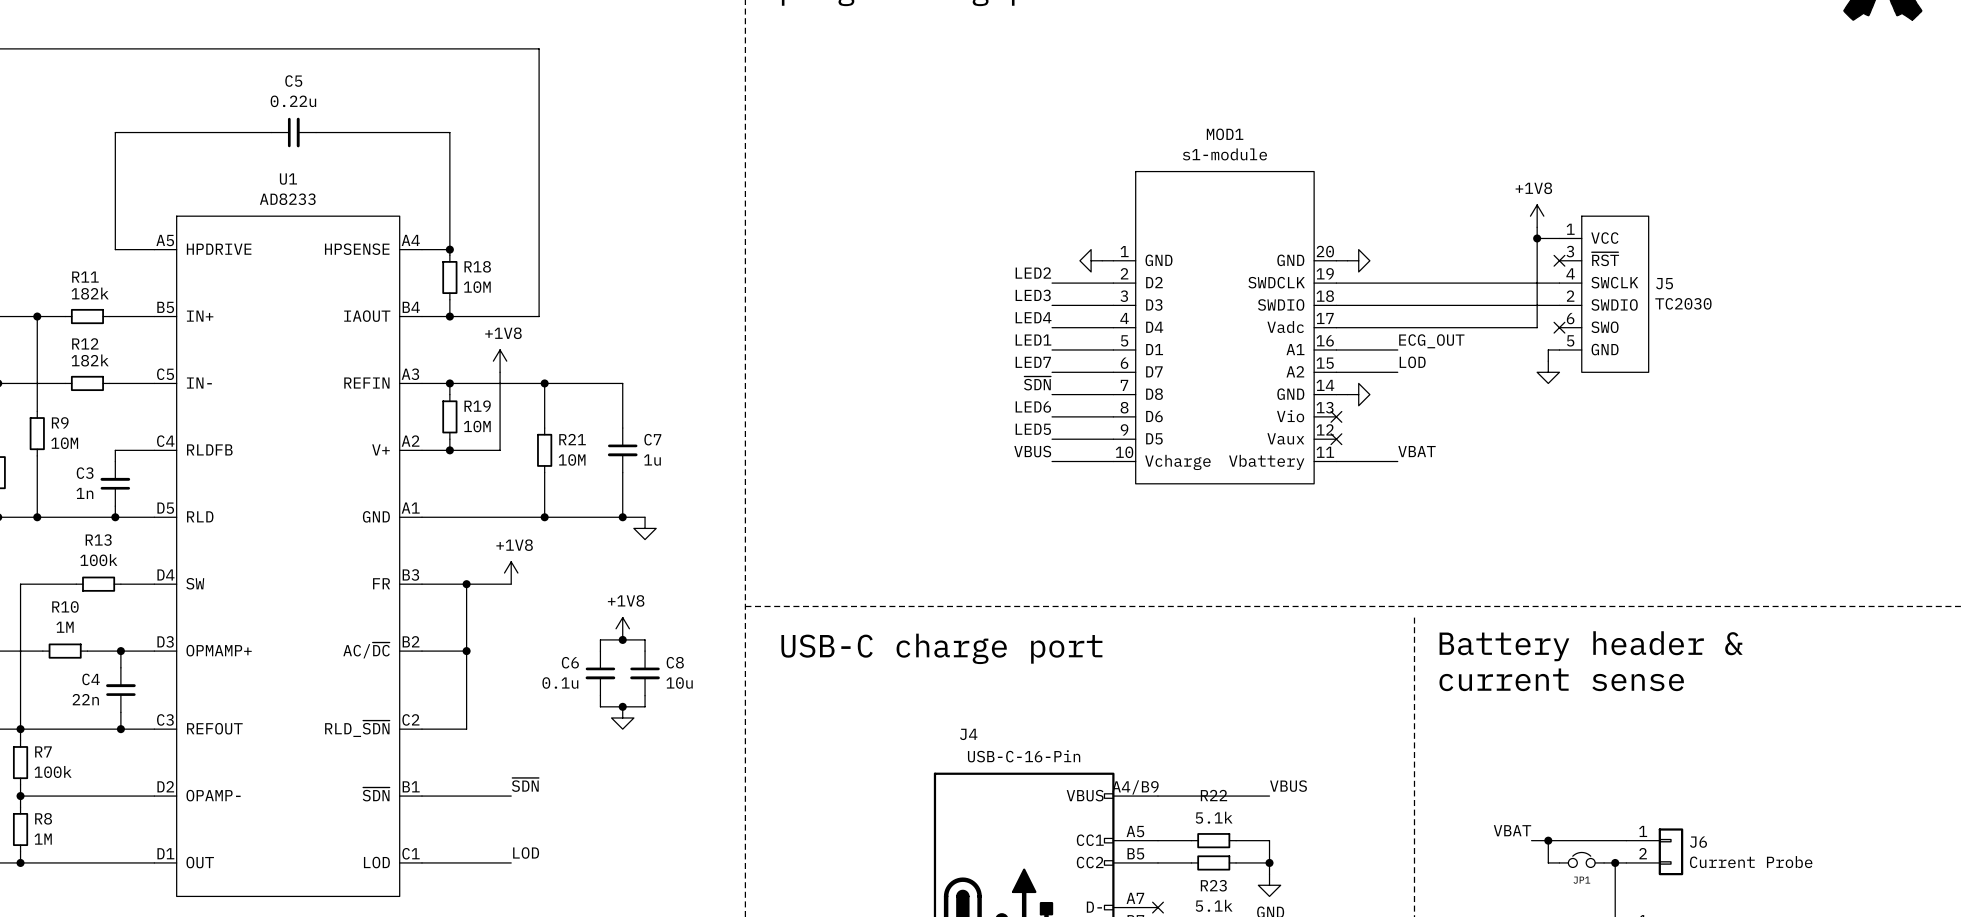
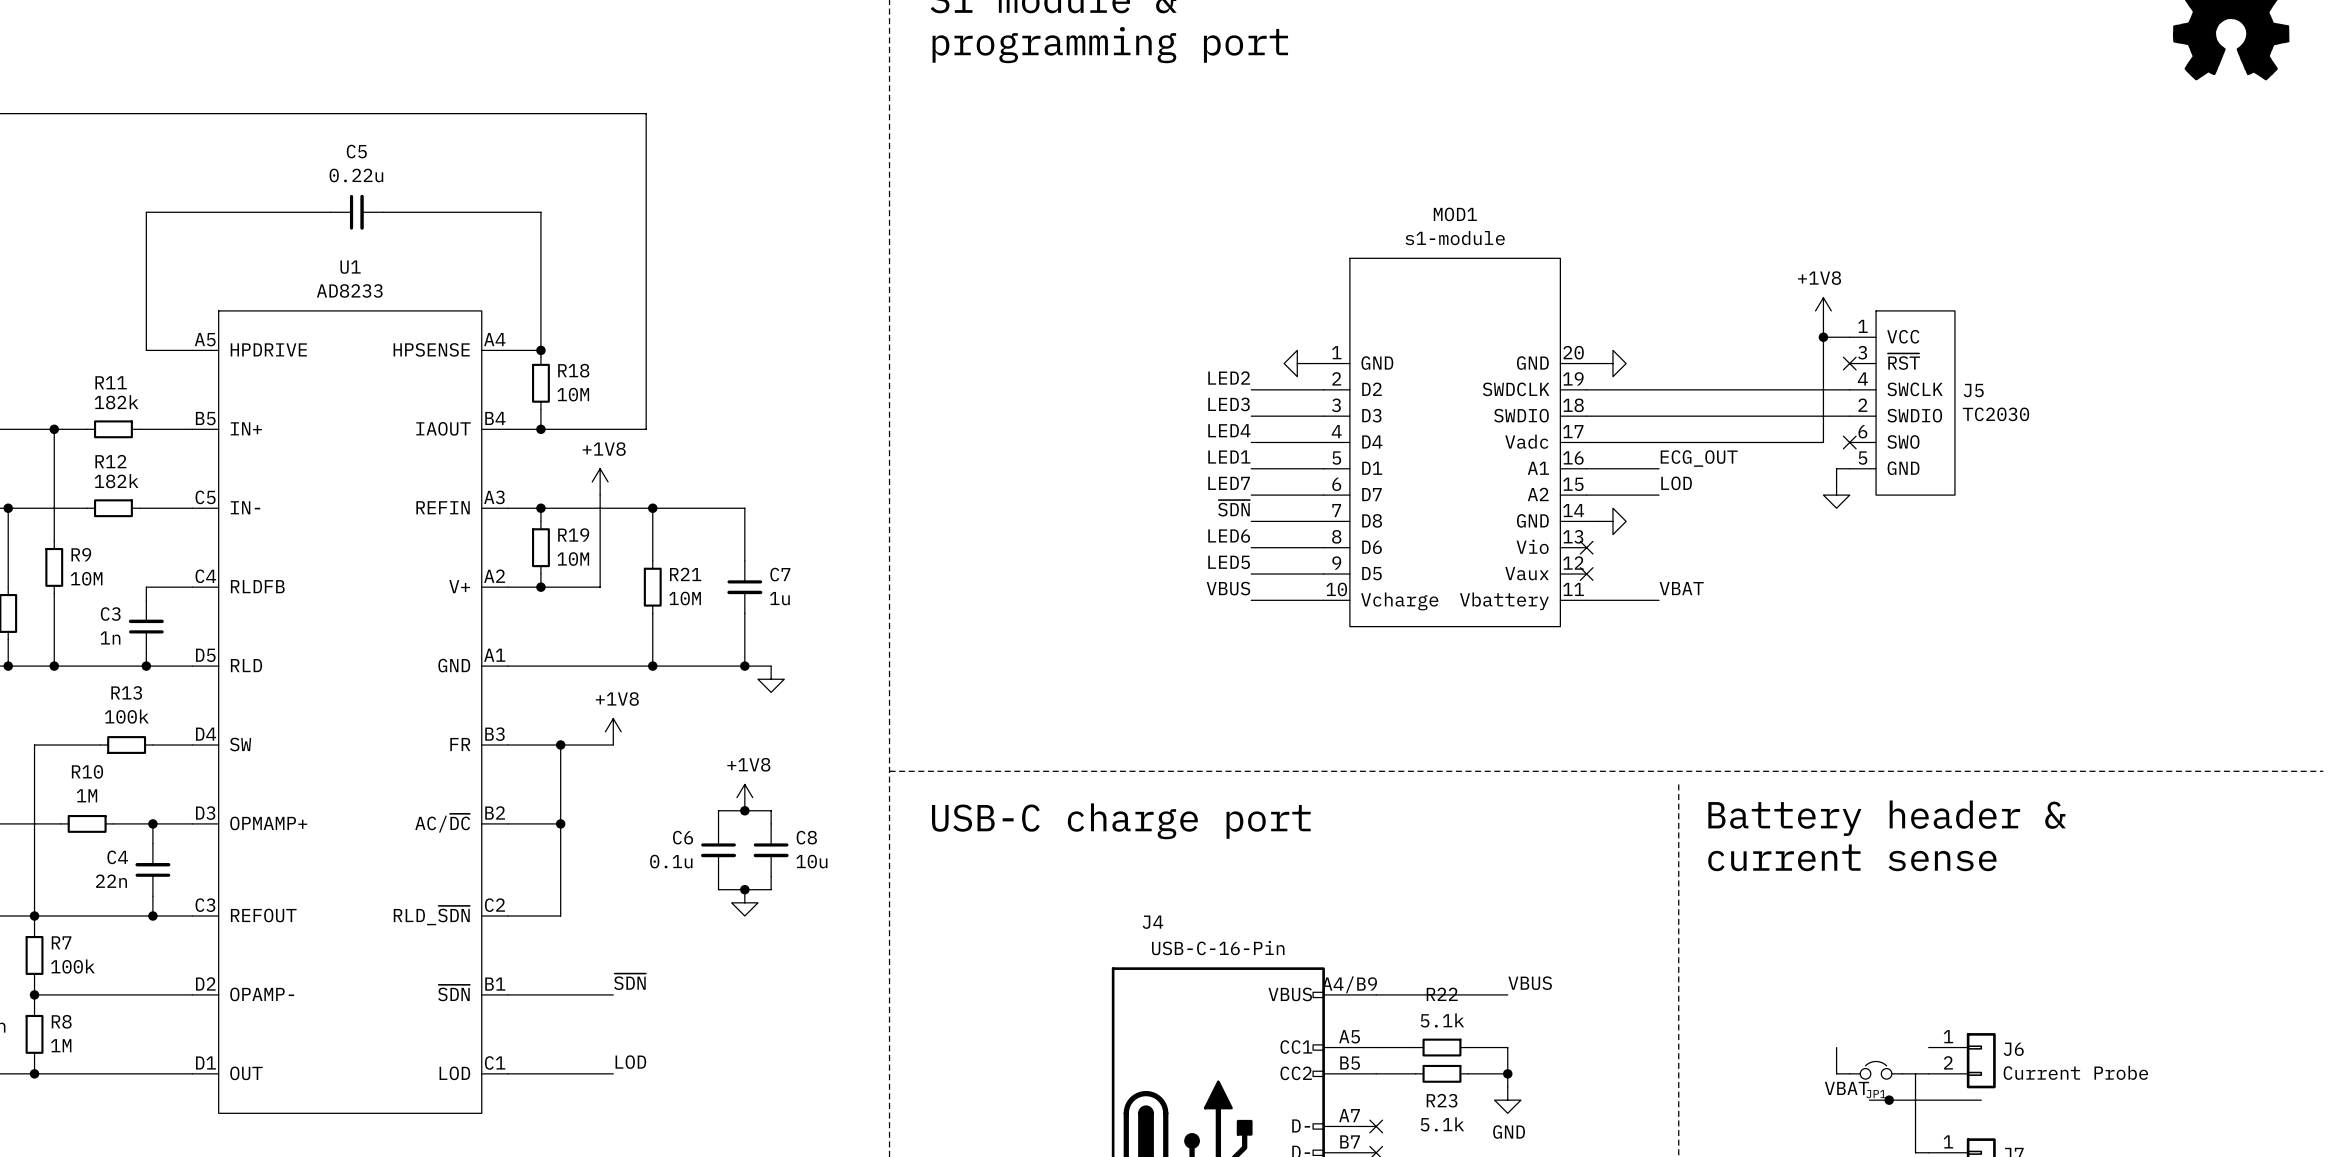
label position: VBAT (1512, 830) -> VBAT (1846, 1088)
wire: (1531, 840) (1626, 840) -> (1869, 1100) (1981, 1100)
junction: (1548, 840) -> none
junction: (1615, 862) -> none
junction: none -> (1889, 1100)

